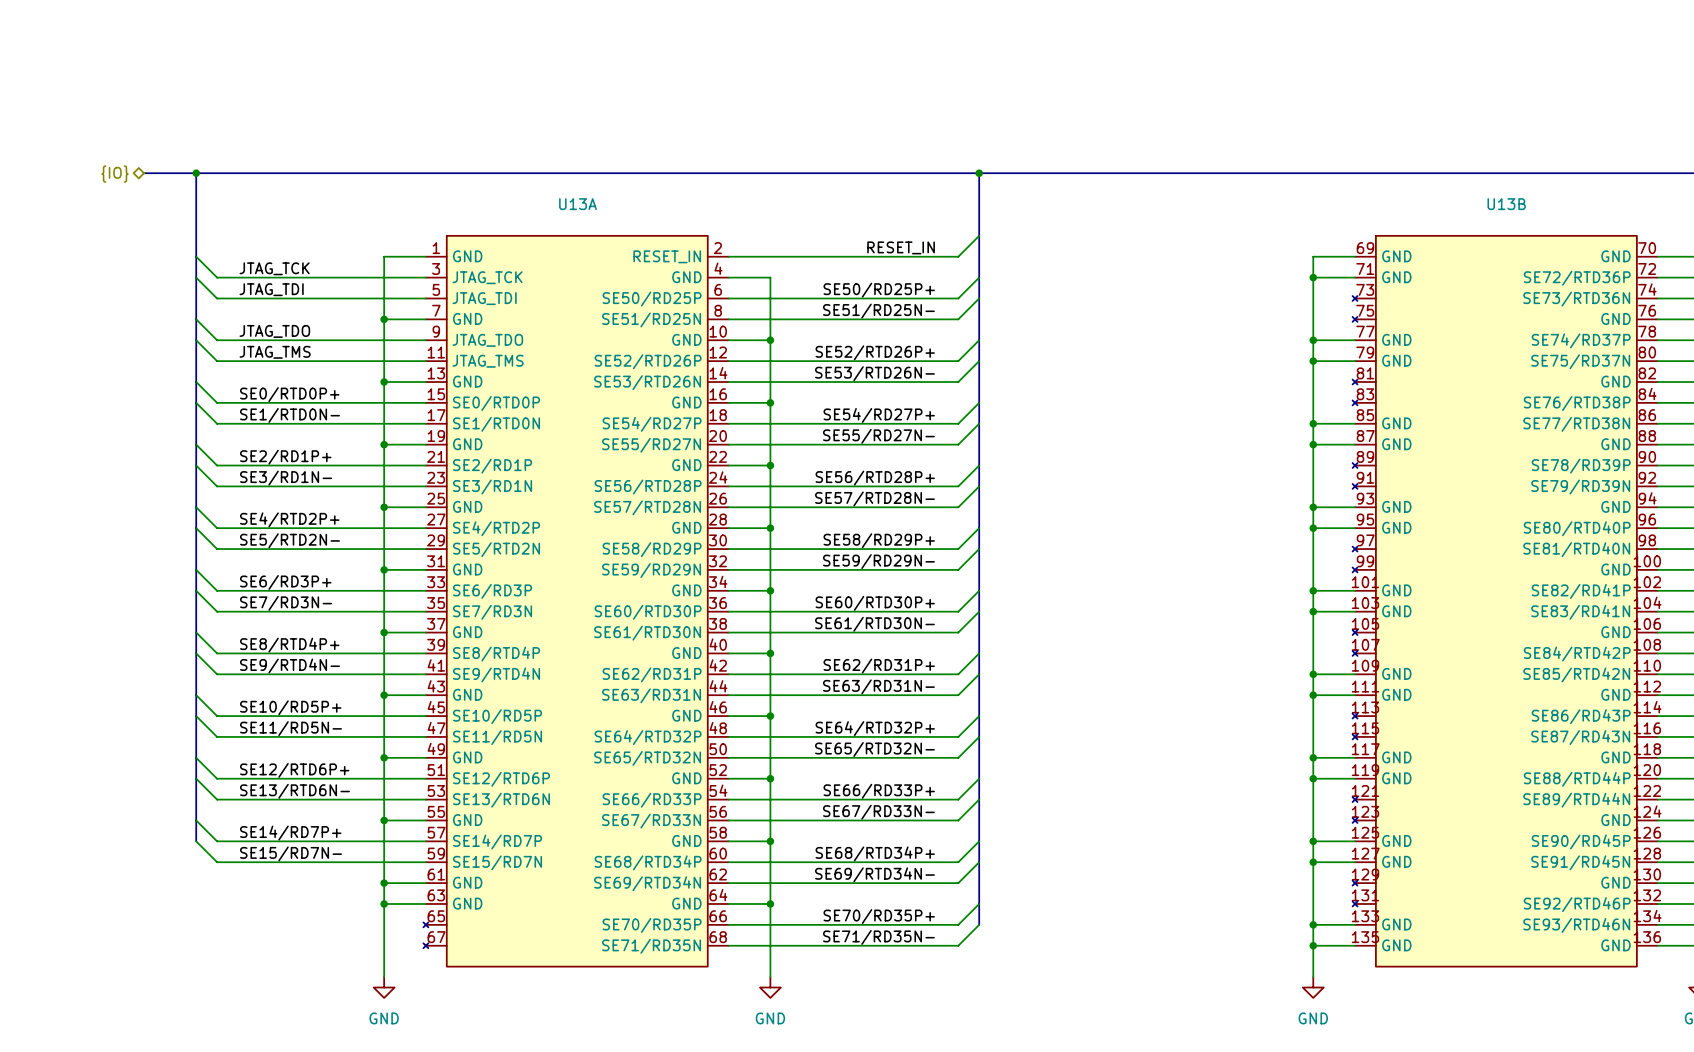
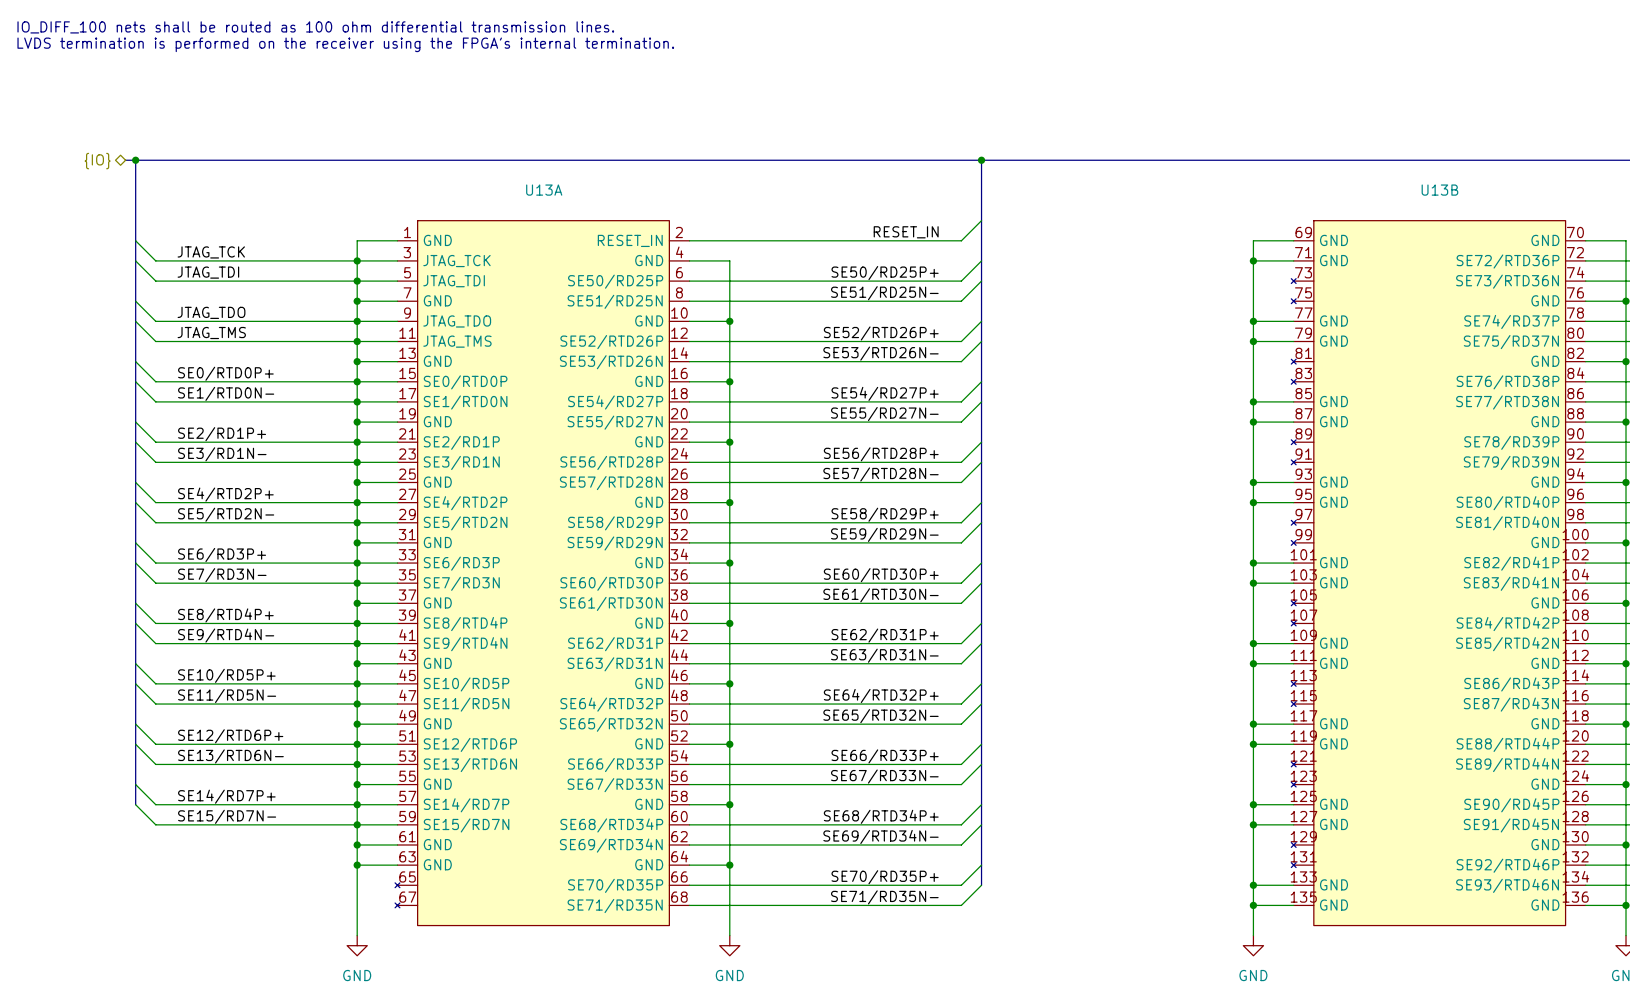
text: none -> IO_DIFF_100 nets shall be routed as 100 ohm differential transmission lines. (315, 27)
text: none -> LVDS termination is performed on the receiver using the FPGA's internal termination. (345, 44)
bus: (196, 173) (196, 841) -> (135, 160) (135, 804)
junction position: (196, 173) -> (135, 160)
bus: (979, 173) (979, 924) -> (981, 160) (981, 885)
junction: (979, 173) -> none
junction: none -> (981, 160)
wire: (979, 235) (958, 256) -> (981, 220) (961, 240) (911, 240)
label position: RESET_IN (901, 247) -> RESET_IN (906, 232)
wire: (196, 256) (217, 277) -> (135, 240) (155, 260) (196, 260)
label position: JTAG_TCK (274, 268) -> JTAG_TCK (211, 252)
wire: (196, 277) (217, 298) -> (135, 260) (155, 281) (196, 281)
junction: none -> (357, 260)
wire: (979, 277) (958, 298) -> (981, 260) (961, 281) (911, 281)
label position: JTAG_TDI (271, 289) -> JTAG_TDI (208, 272)
label position: SE50/RD25P+ (879, 290) -> SE50/RD25P+ (885, 273)
junction: none -> (357, 281)
wire: (979, 298) (958, 319) -> (981, 281) (961, 301) (911, 301)
label position: SE51/RD25N- (878, 311) -> SE51/RD25N- (884, 293)
wire: (196, 319) (217, 340) -> (135, 301) (155, 321) (196, 321)
label position: JTAG_TDO (274, 331) -> JTAG_TDO (211, 312)
wire: (196, 340) (217, 361) -> (135, 321) (155, 341) (196, 341)
junction: none -> (357, 321)
wire: (979, 340) (958, 361) -> (981, 321) (961, 341) (911, 341)
label position: JTAG_TMS (275, 352) -> JTAG_TMS (211, 333)
label position: SE52/RTD26P+ (875, 352) -> SE52/RTD26P+ (881, 333)
junction: none -> (357, 341)
wire: (979, 361) (958, 382) -> (981, 341) (961, 361) (911, 361)
label position: SE53/RTD26N- (874, 373) -> SE53/RTD26N- (881, 353)
wire: (196, 382) (217, 402) -> (135, 361) (155, 381) (196, 381)
label position: SE0/RTD0P+ (289, 394) -> SE0/RTD0P+ (225, 373)
wire: (196, 402) (217, 423) -> (135, 381) (155, 401) (196, 401)
junction: none -> (357, 381)
wire: (979, 402) (958, 423) -> (981, 381) (961, 401) (911, 401)
label position: SE1/RTD0N- (290, 415) -> SE1/RTD0N- (226, 393)
label position: SE54/RD27P+ (879, 415) -> SE54/RD27P+ (885, 393)
junction: none -> (357, 401)
wire: (979, 423) (958, 444) -> (981, 401) (961, 422) (911, 422)
label position: SE55/RD27N- (878, 436) -> SE55/RD27N- (884, 414)
wire: (196, 444) (217, 465) -> (135, 422) (155, 442) (196, 442)
label position: SE2/RD1P+ (285, 457) -> SE2/RD1P+ (222, 434)
wire: (196, 465) (217, 486) -> (135, 442) (155, 462) (196, 462)
junction: none -> (357, 442)
wire: (979, 465) (958, 486) -> (981, 442) (961, 462) (911, 462)
label position: SE3/RD1N- (286, 478) -> SE3/RD1N- (222, 454)
label position: SE56/RTD28P+ (875, 478) -> SE56/RTD28P+ (881, 454)
junction: none -> (357, 462)
wire: (979, 486) (958, 507) -> (981, 462) (961, 482) (911, 482)
label position: SE57/RTD28N- (874, 498) -> SE57/RTD28N- (881, 474)
wire: (196, 507) (217, 528) -> (135, 482) (155, 502) (196, 502)
label position: SE4/RTD2P+ (289, 519) -> SE4/RTD2P+ (225, 494)
wire: (196, 528) (217, 549) -> (135, 502) (155, 522) (196, 522)
junction: none -> (357, 502)
wire: (979, 528) (958, 549) -> (981, 502) (961, 522) (911, 522)
label position: SE5/RTD2N- (290, 540) -> SE5/RTD2N- (226, 514)
label position: SE58/RD29P+ (879, 540) -> SE58/RD29P+ (885, 514)
junction: none -> (357, 522)
wire: (979, 549) (958, 569) -> (981, 522) (961, 542) (911, 542)
label position: SE59/RD29N- (878, 561) -> SE59/RD29N- (884, 534)
wire: (196, 569) (217, 590) -> (135, 542) (155, 563) (196, 563)
label position: SE6/RD3P+ (285, 582) -> SE6/RD3P+ (222, 555)
wire: (196, 590) (217, 611) -> (135, 563) (155, 583) (196, 583)
junction: none -> (357, 563)
wire: (979, 590) (958, 611) -> (981, 563) (961, 583) (911, 583)
label position: SE7/RD3N- (286, 603) -> SE7/RD3N- (222, 575)
label position: SE60/RTD30P+ (875, 603) -> SE60/RTD30P+ (881, 575)
junction: none -> (357, 583)
wire: (979, 611) (958, 632) -> (981, 583) (961, 603) (911, 603)
label position: SE61/RTD30N- (874, 624) -> SE61/RTD30N- (881, 595)
wire: (196, 632) (217, 653) -> (135, 603) (155, 623) (196, 623)
label position: SE8/RTD4P+ (289, 645) -> SE8/RTD4P+ (225, 615)
wire: (196, 653) (217, 674) -> (135, 623) (155, 643) (196, 643)
junction: none -> (357, 623)
wire: (979, 653) (958, 674) -> (981, 623) (961, 643) (911, 643)
label position: SE9/RTD4N- (290, 665) -> SE9/RTD4N- (226, 635)
label position: SE62/RD31P+ (879, 665) -> SE62/RD31P+ (885, 635)
junction: none -> (357, 643)
wire: (979, 674) (958, 695) -> (981, 643) (961, 663) (911, 663)
label position: SE63/RD31N- (878, 686) -> SE63/RD31N- (884, 655)
wire: (196, 695) (217, 716) -> (135, 663) (155, 683) (196, 683)
label position: SE10/RD5P+ (290, 707) -> SE10/RD5P+ (226, 675)
wire: (196, 716) (217, 736) -> (135, 683) (155, 704) (196, 704)
junction: none -> (357, 683)
wire: (979, 716) (958, 736) -> (981, 683) (961, 704) (911, 704)
label position: SE11/RD5N- (291, 728) -> SE11/RD5N- (227, 695)
label position: SE64/RTD32P+ (875, 728) -> SE64/RTD32P+ (881, 695)
junction: none -> (357, 704)
wire: (979, 736) (958, 757) -> (981, 704) (961, 724) (911, 724)
label position: SE65/RTD32N- (874, 749) -> SE65/RTD32N- (881, 716)
wire: (196, 757) (217, 778) -> (135, 724) (155, 744) (196, 744)
label position: SE12/RTD6P+ (294, 770) -> SE12/RTD6P+ (230, 736)
wire: (196, 778) (217, 799) -> (135, 744) (155, 764) (196, 764)
junction: none -> (357, 744)
wire: (979, 778) (958, 799) -> (981, 744) (961, 764) (911, 764)
label position: SE13/RTD6N- (294, 791) -> SE13/RTD6N- (230, 756)
label position: SE66/RD33P+ (879, 791) -> SE66/RD33P+ (885, 756)
junction: none -> (357, 764)
wire: (979, 799) (958, 820) -> (981, 764) (961, 784) (911, 784)
label position: SE67/RD33N- (878, 812) -> SE67/RD33N- (884, 776)
wire: (196, 820) (217, 841) -> (135, 784) (155, 804) (196, 804)
label position: SE14/RD7P+ (290, 833) -> SE14/RD7P+ (226, 796)
wire: (196, 841) (217, 862) -> (135, 804) (155, 824) (196, 824)
junction: none -> (357, 804)
wire: (979, 841) (958, 862) -> (981, 804) (961, 824) (911, 824)
label position: SE15/RD7N- (291, 853) -> SE15/RD7N- (227, 816)
label position: SE68/RTD34P+ (875, 853) -> SE68/RTD34P+ (881, 816)
junction: none -> (357, 824)
wire: (979, 862) (958, 883) -> (981, 824) (961, 844) (911, 844)
label position: SE69/RTD34N- (874, 874) -> SE69/RTD34N- (881, 836)
wire: (979, 903) (958, 924) -> (981, 865) (961, 885) (911, 885)
label position: SE70/RD35P+ (879, 916) -> SE70/RD35P+ (885, 877)
wire: (979, 924) (958, 945) -> (981, 885) (961, 905) (911, 905)
label position: SE71/RD35N- (878, 937) -> SE71/RD35N- (884, 897)

